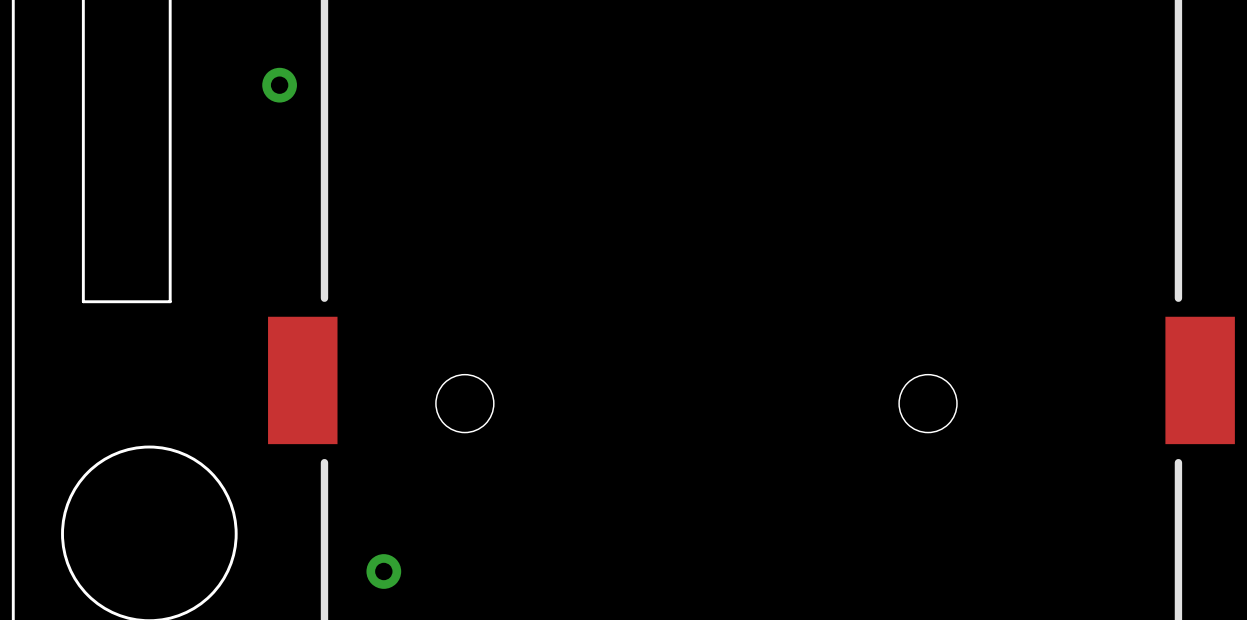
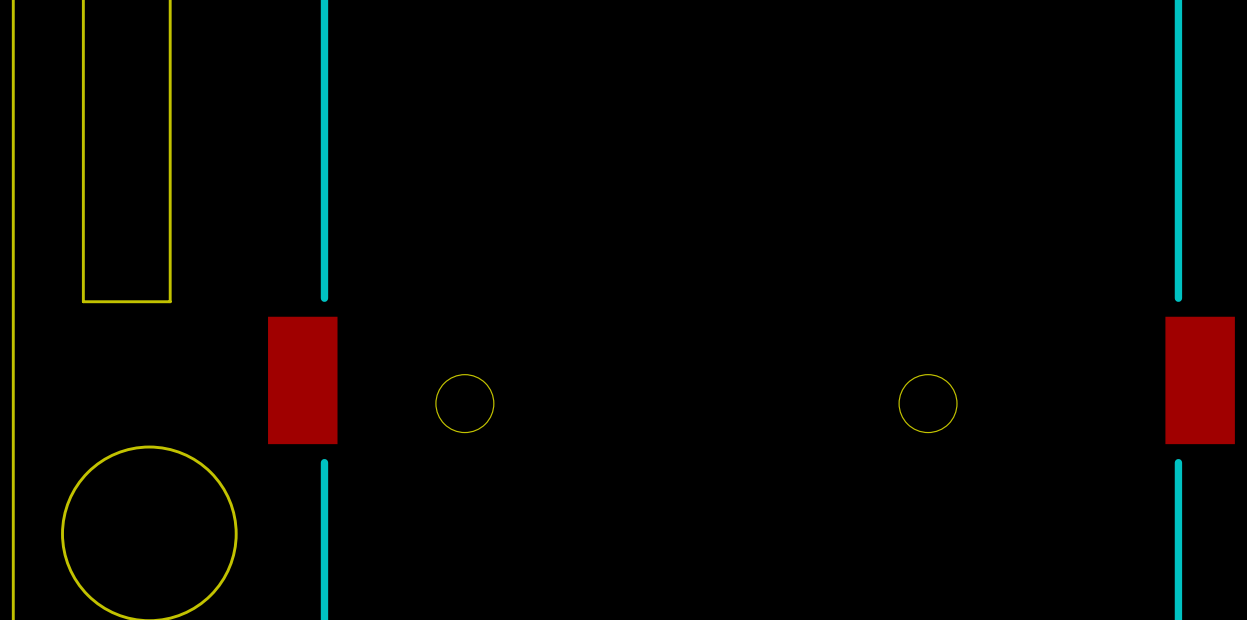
via: (279, 85) -> none
via: (383, 571) -> none

